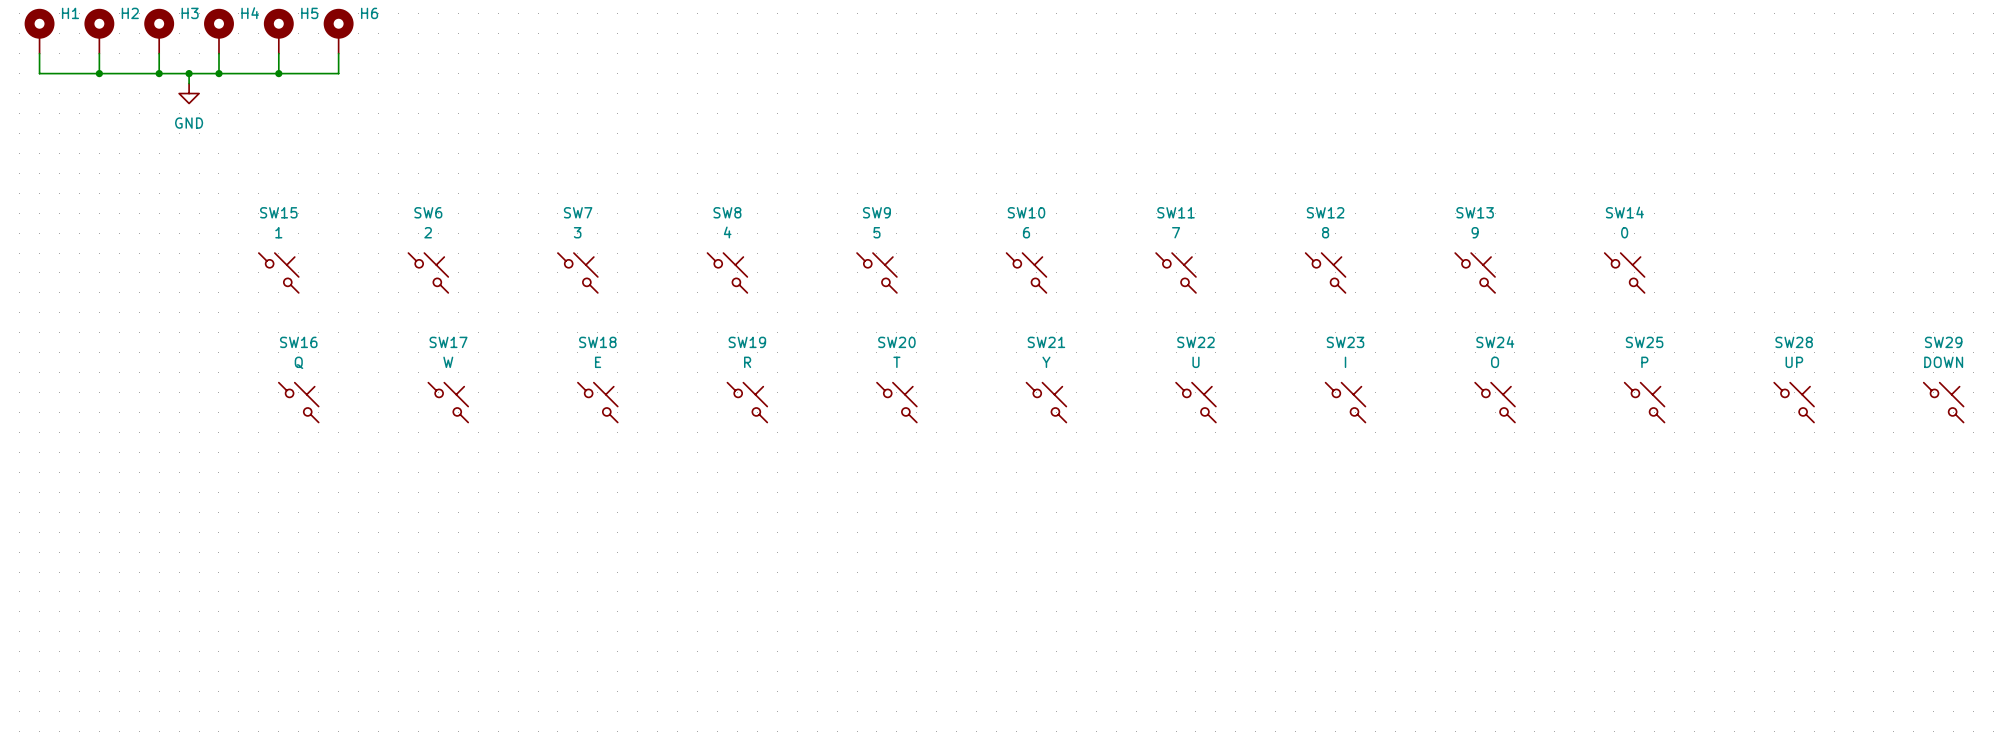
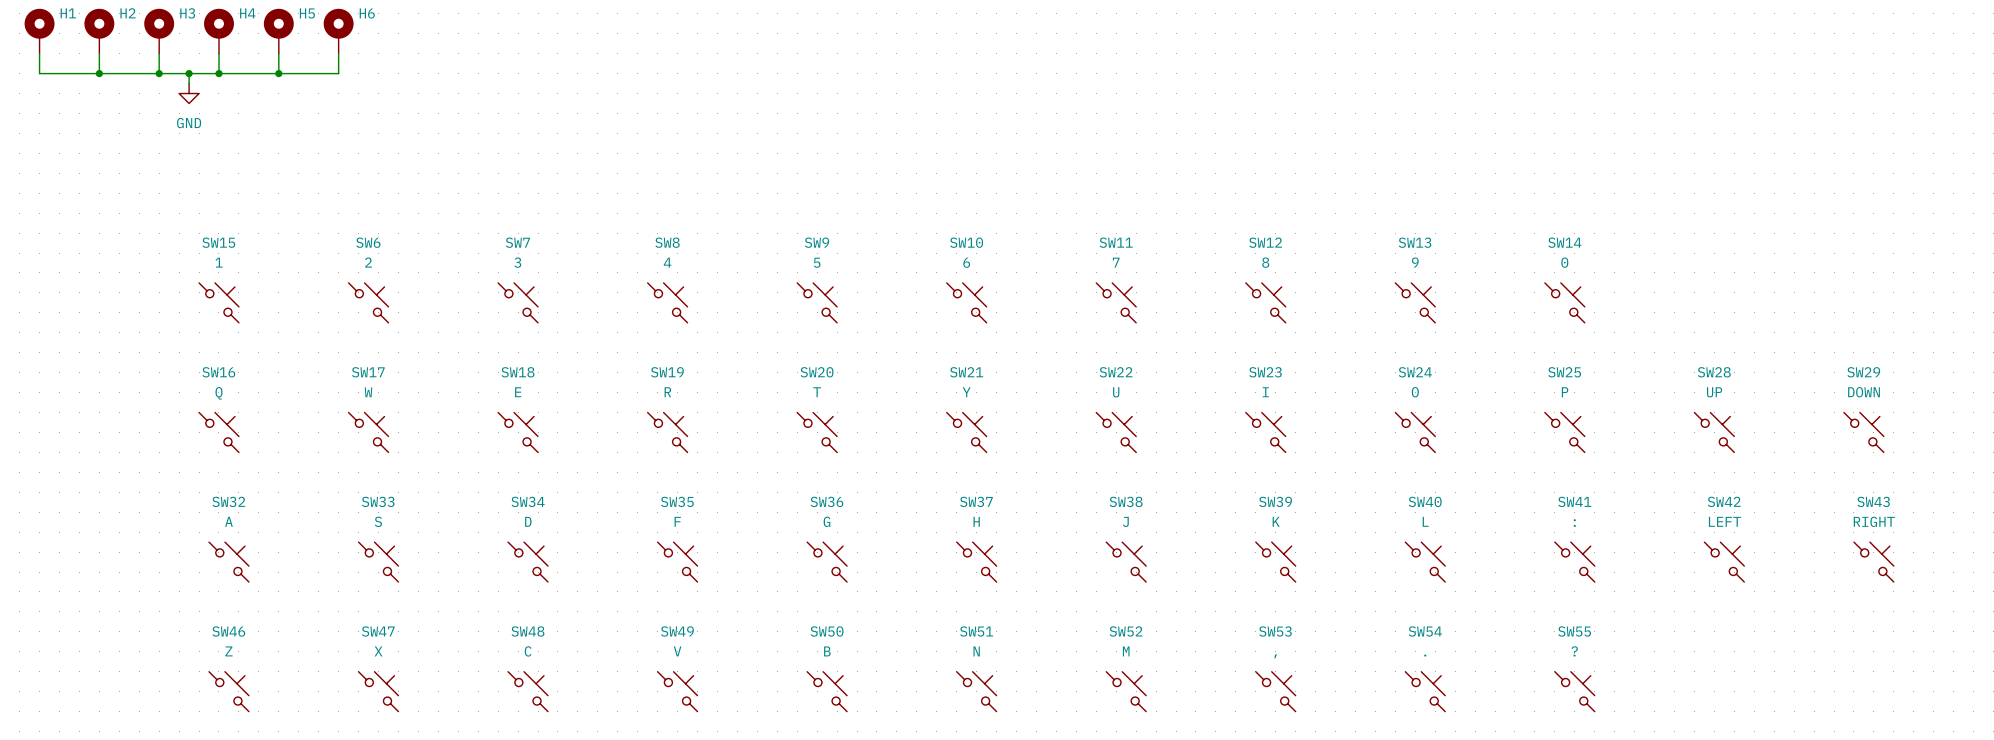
SW15 position: (278, 272) -> (218, 302)
SW6 position: (428, 272) -> (368, 302)
SW7 position: (577, 272) -> (518, 302)
SW8 position: (727, 272) -> (667, 302)
SW9 position: (876, 272) -> (817, 302)
SW10 position: (1026, 272) -> (966, 302)
SW11 position: (1176, 272) -> (1116, 302)
SW12 position: (1325, 272) -> (1265, 302)
SW13 position: (1475, 272) -> (1415, 302)
SW14 position: (1624, 272) -> (1564, 302)
SW16 position: (298, 402) -> (218, 432)
SW17 position: (448, 402) -> (368, 432)
SW18 position: (597, 402) -> (518, 432)
SW19 position: (747, 402) -> (667, 432)
SW20 position: (896, 402) -> (817, 432)
SW21 position: (1046, 402) -> (966, 432)
SW22 position: (1195, 402) -> (1116, 432)
SW23 position: (1345, 402) -> (1265, 432)
SW24 position: (1495, 402) -> (1415, 432)
SW25 position: (1644, 402) -> (1564, 432)
SW28 position: (1794, 402) -> (1714, 432)
SW29 position: (1943, 402) -> (1863, 432)
SW32: none -> A (228, 562)
SW33: none -> S (378, 562)
SW34: none -> D (528, 562)
SW35: none -> F (677, 562)
SW36: none -> G (827, 562)
SW37: none -> H (976, 562)
SW38: none -> J (1126, 562)
SW39: none -> K (1275, 562)
SW40: none -> L (1425, 562)
SW41: none -> : (1574, 562)
SW42: none -> LEFT (1724, 562)
SW43: none -> RIGHT (1873, 562)
SW46: none -> Z (228, 691)
SW47: none -> X (378, 691)
SW48: none -> C (528, 691)
SW49: none -> V (677, 691)
SW50: none -> B (827, 691)
SW51: none -> N (976, 691)
SW52: none -> M (1126, 691)
SW53: none -> , (1275, 691)
SW54: none -> . (1425, 691)
SW55: none -> ? (1574, 691)

